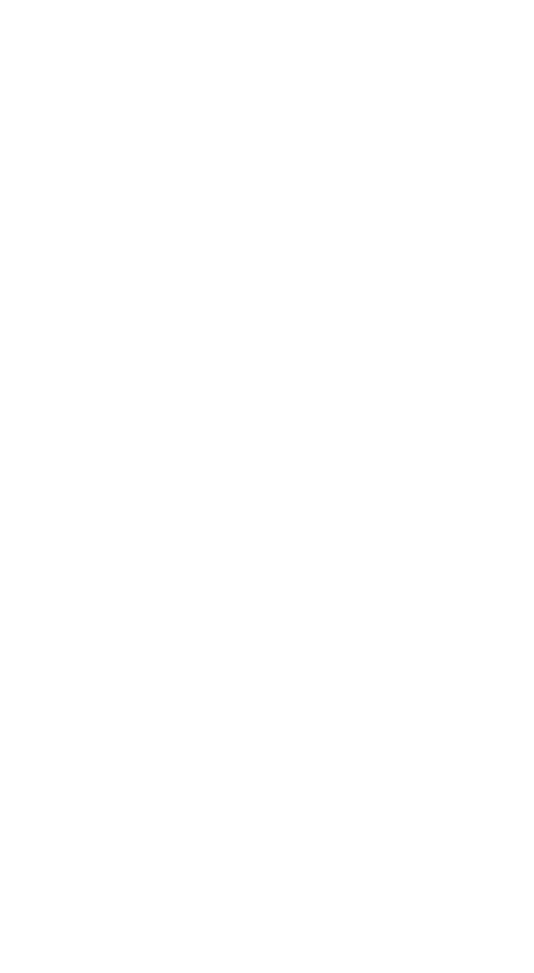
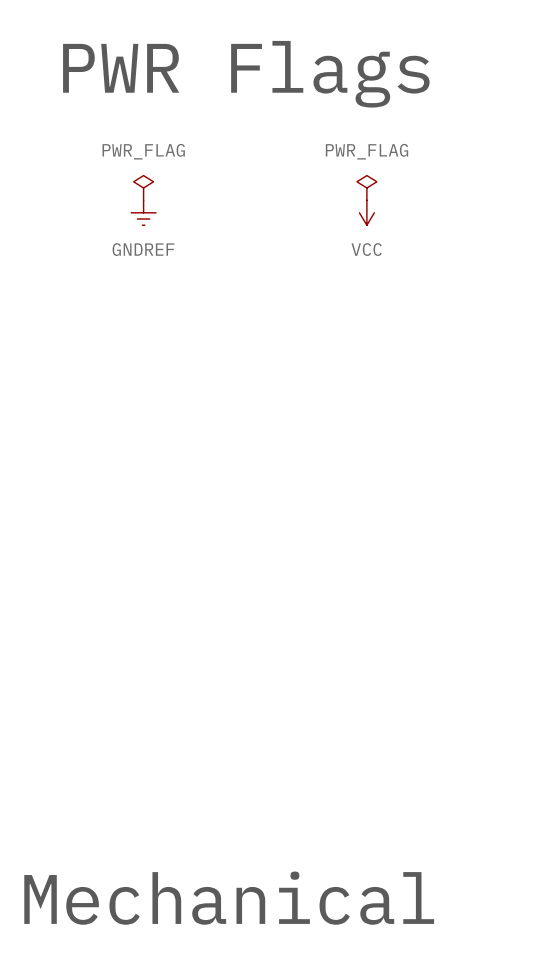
text: none -> PWR Flags (246, 74)
power symbol: none -> PWR_FLAG (143, 188)
power symbol: none -> PWR_FLAG (366, 188)
power symbol: none -> GNDREF (143, 212)
power symbol: none -> VCC (366, 212)
text: none -> Mechanical (229, 898)

